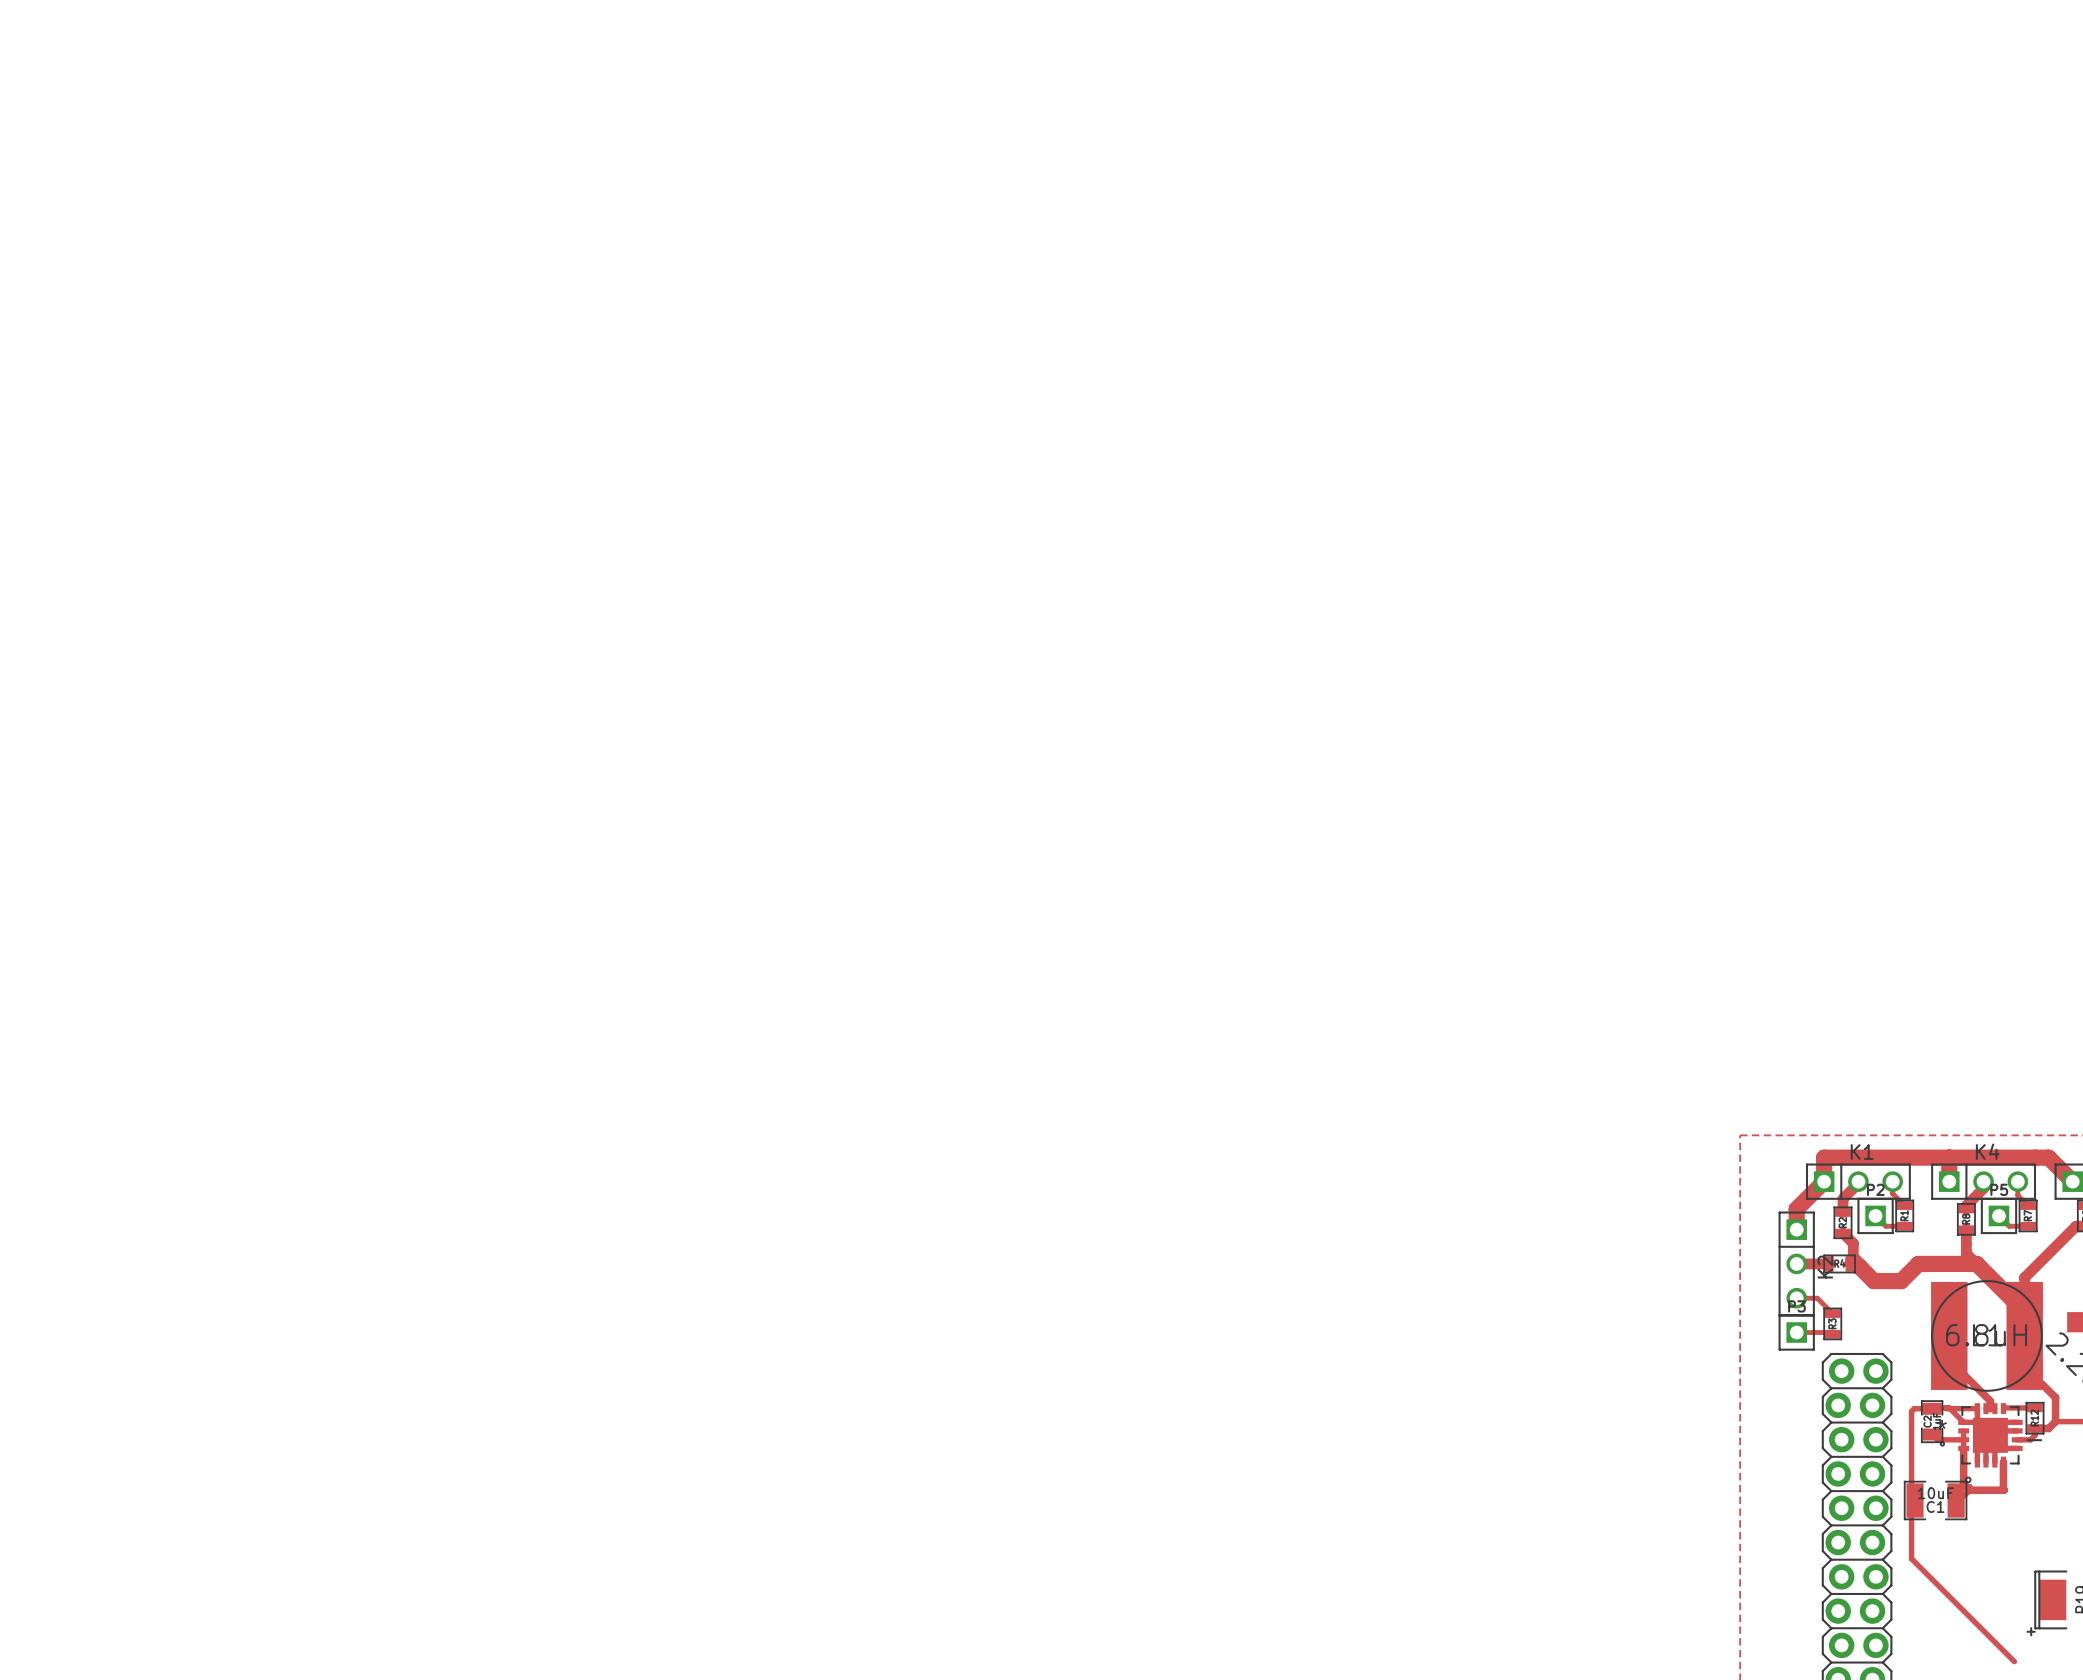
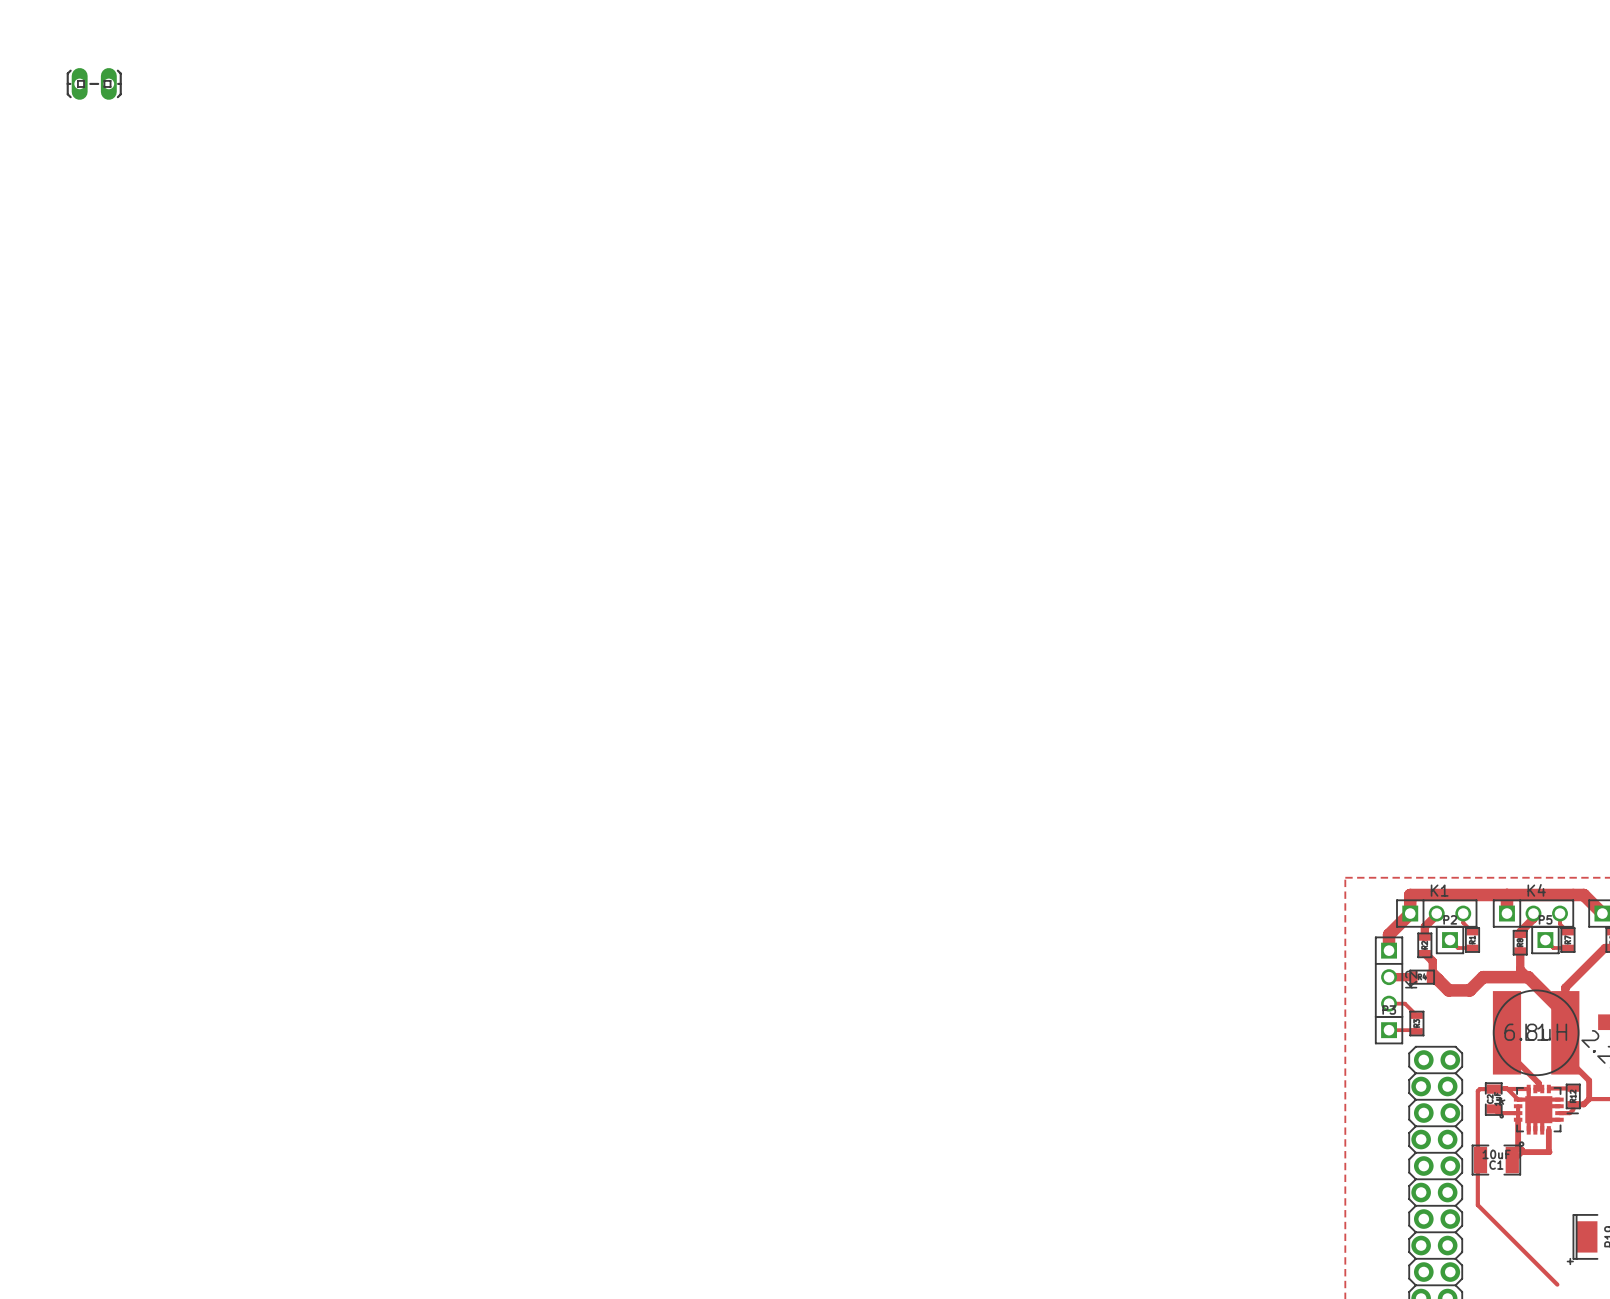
part: none -> (94, 83)

